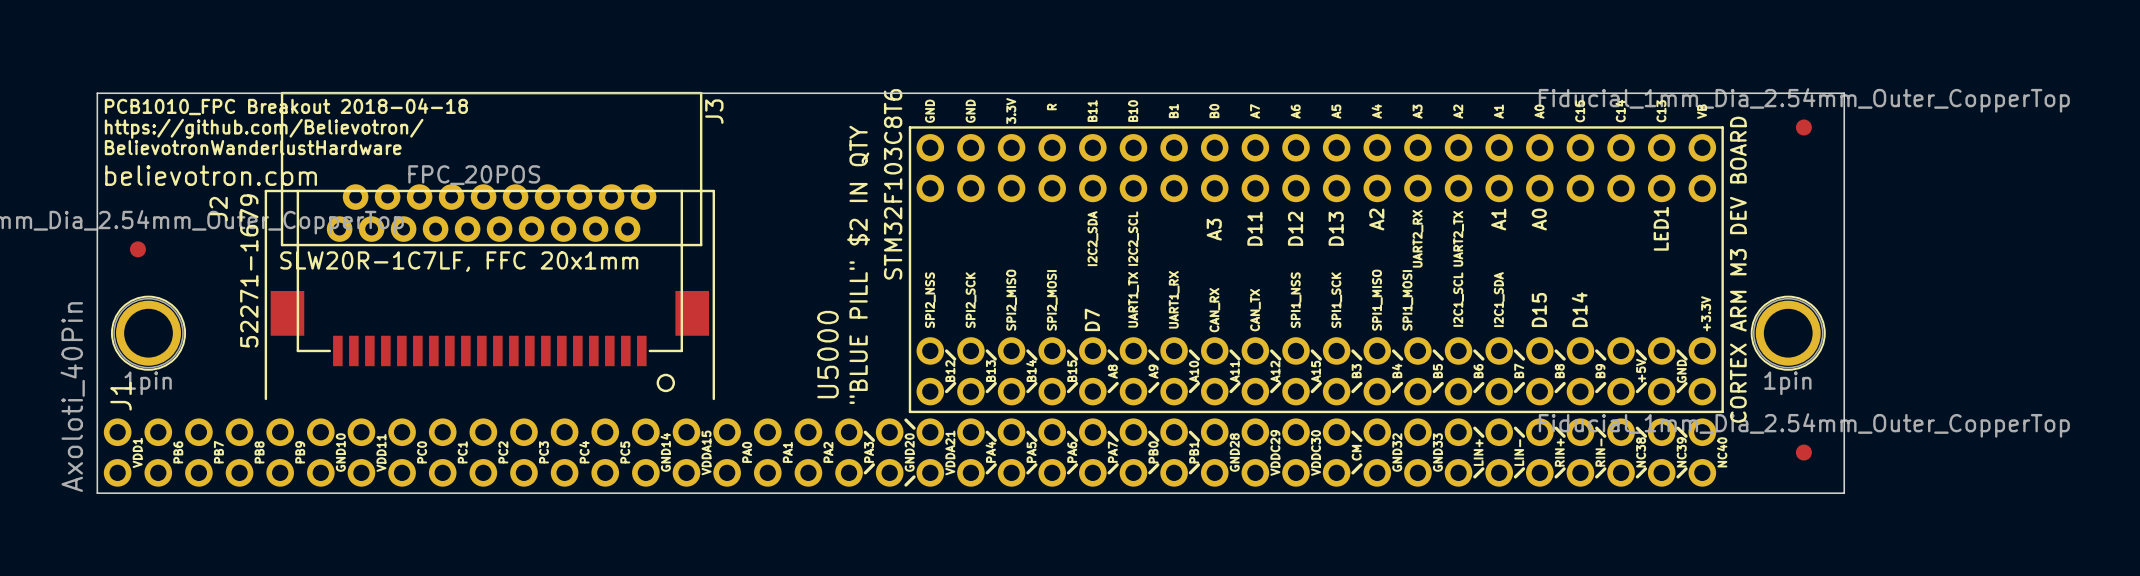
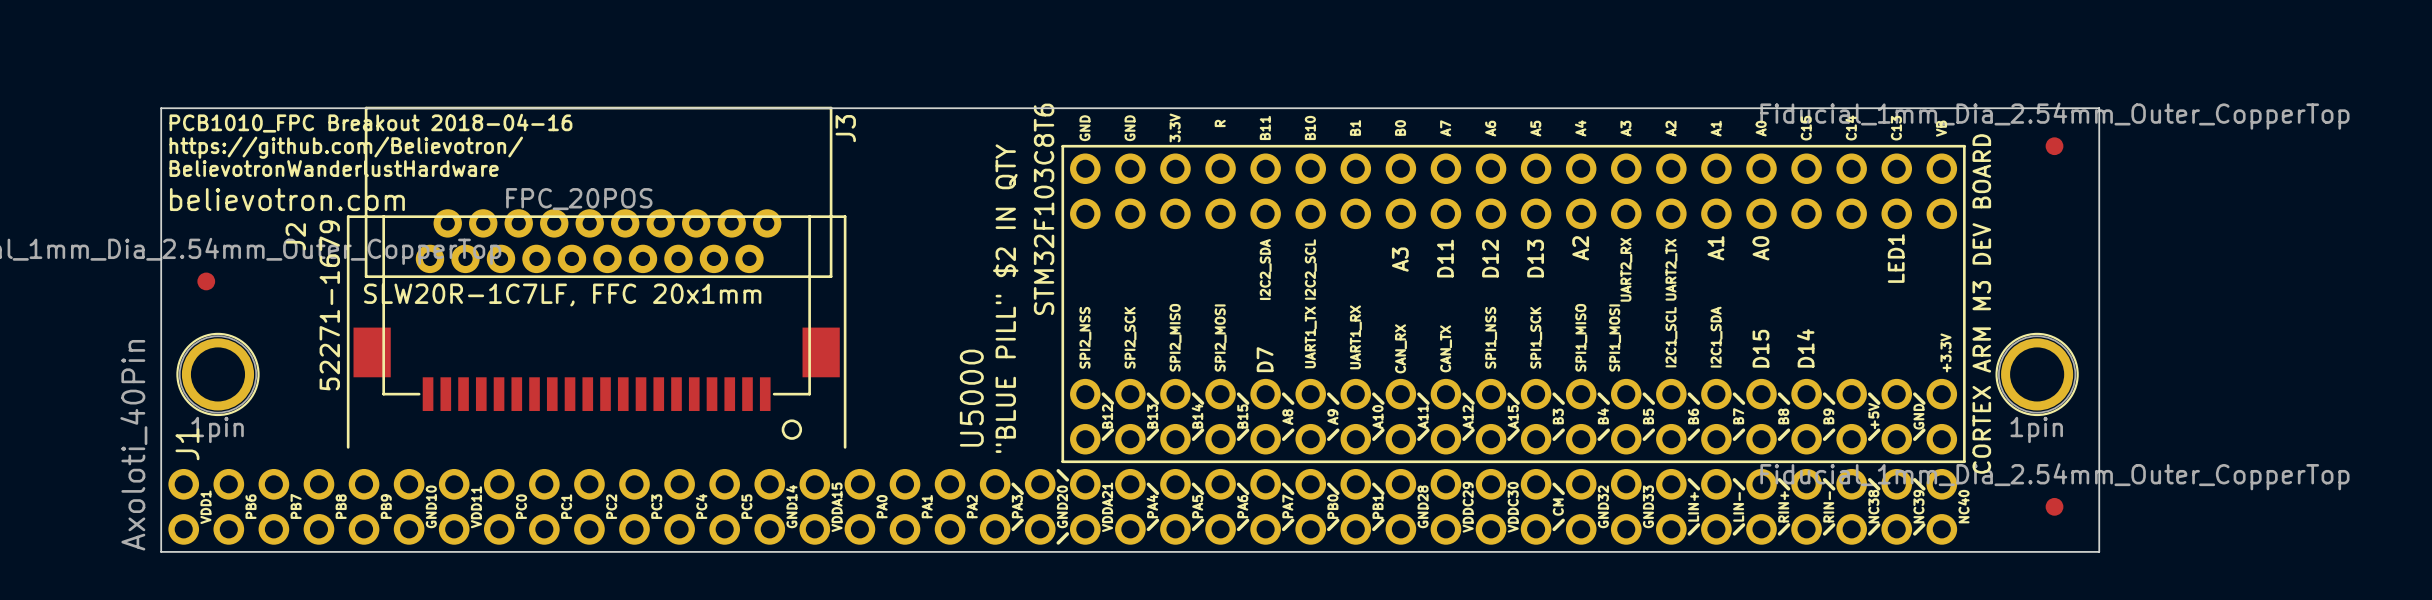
text: PCB1010_FPC Breakout 2018-04-18 (286, 106) -> PCB1010_FPC Breakout 2018-04-16 (370, 123)

